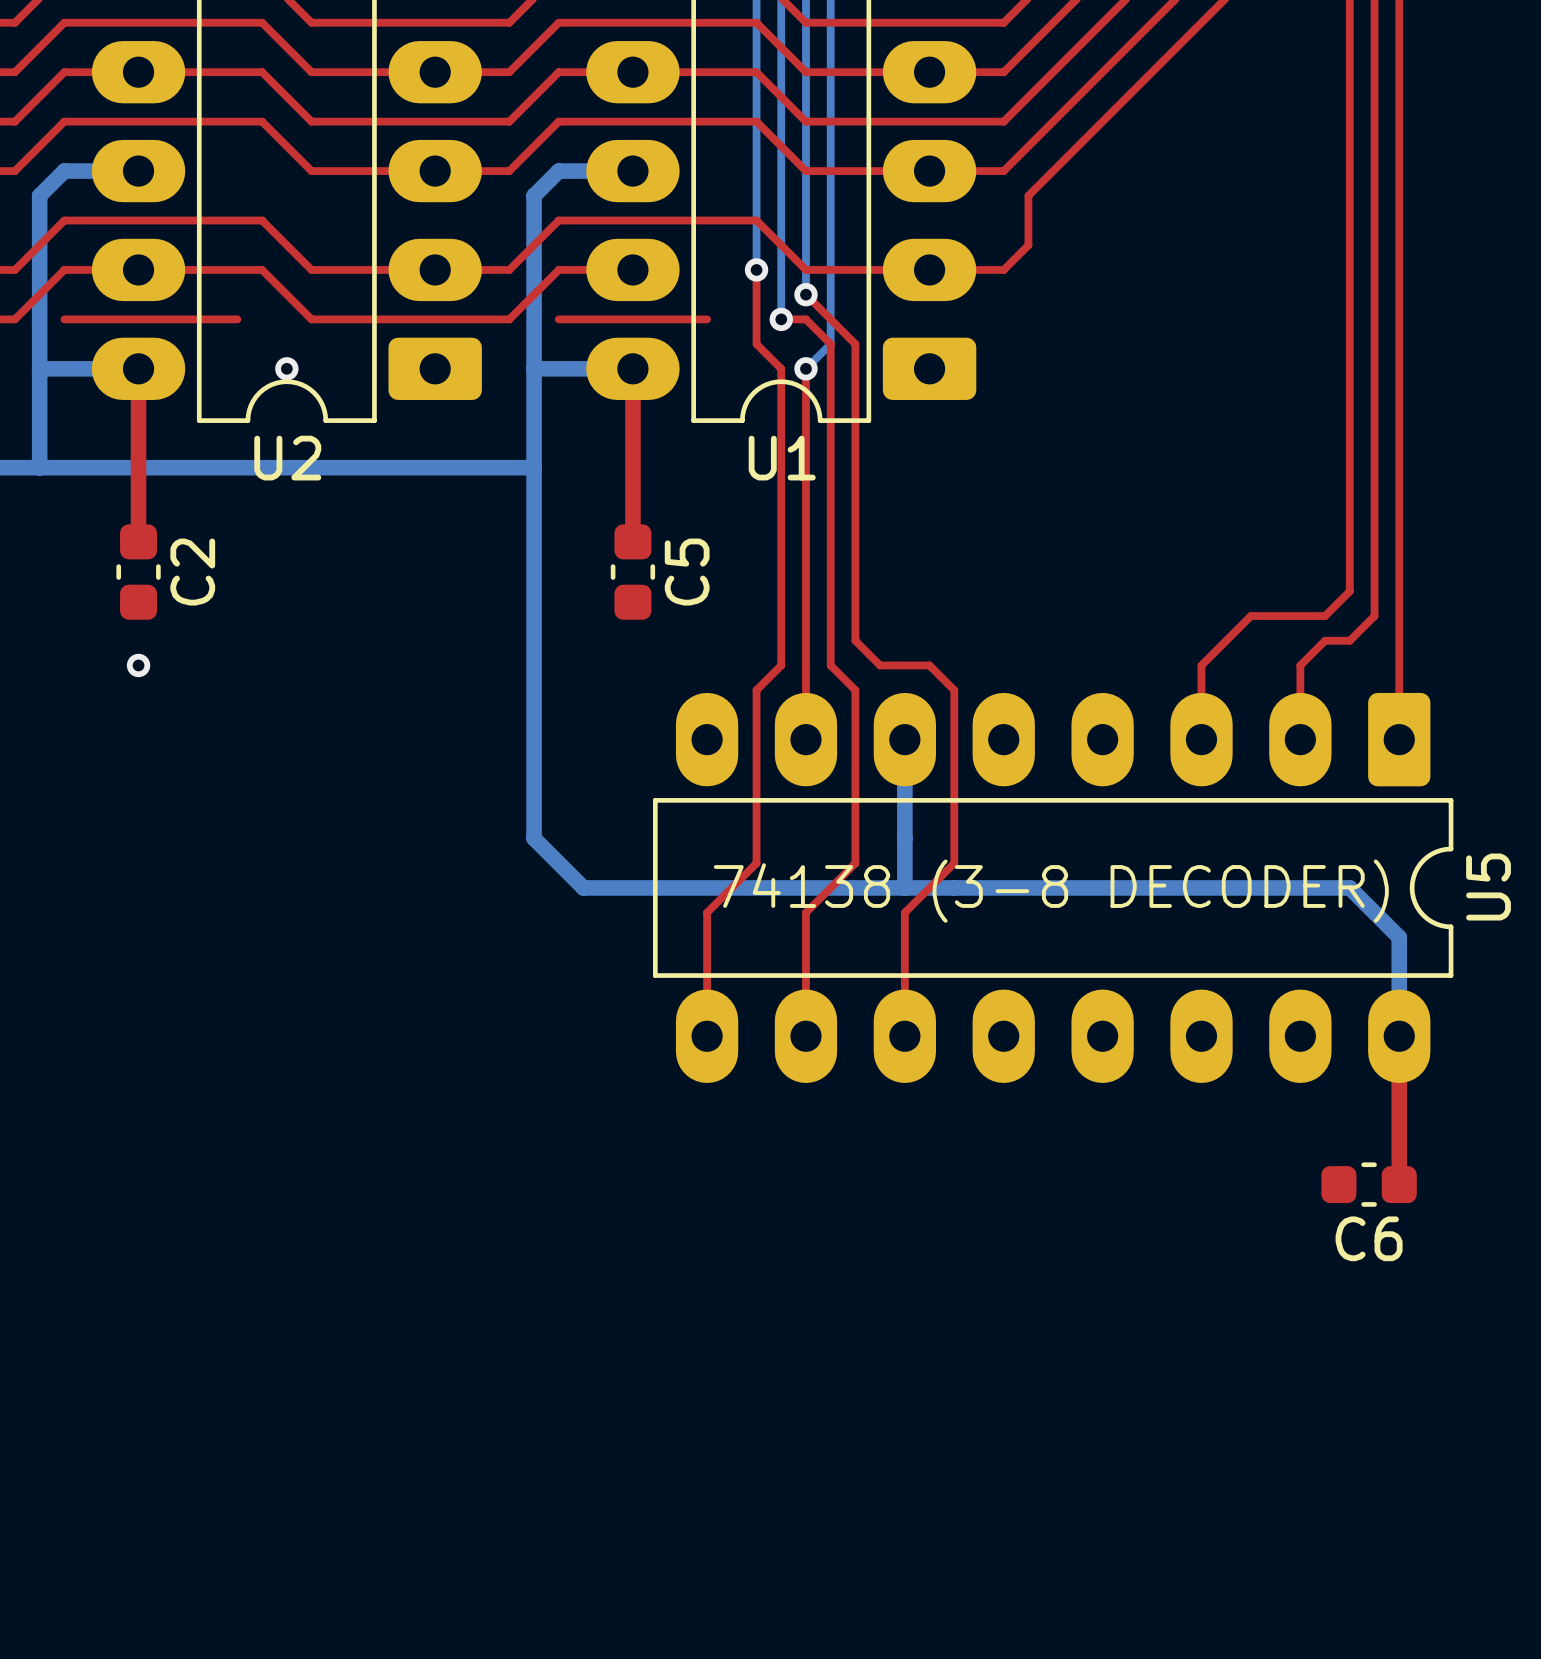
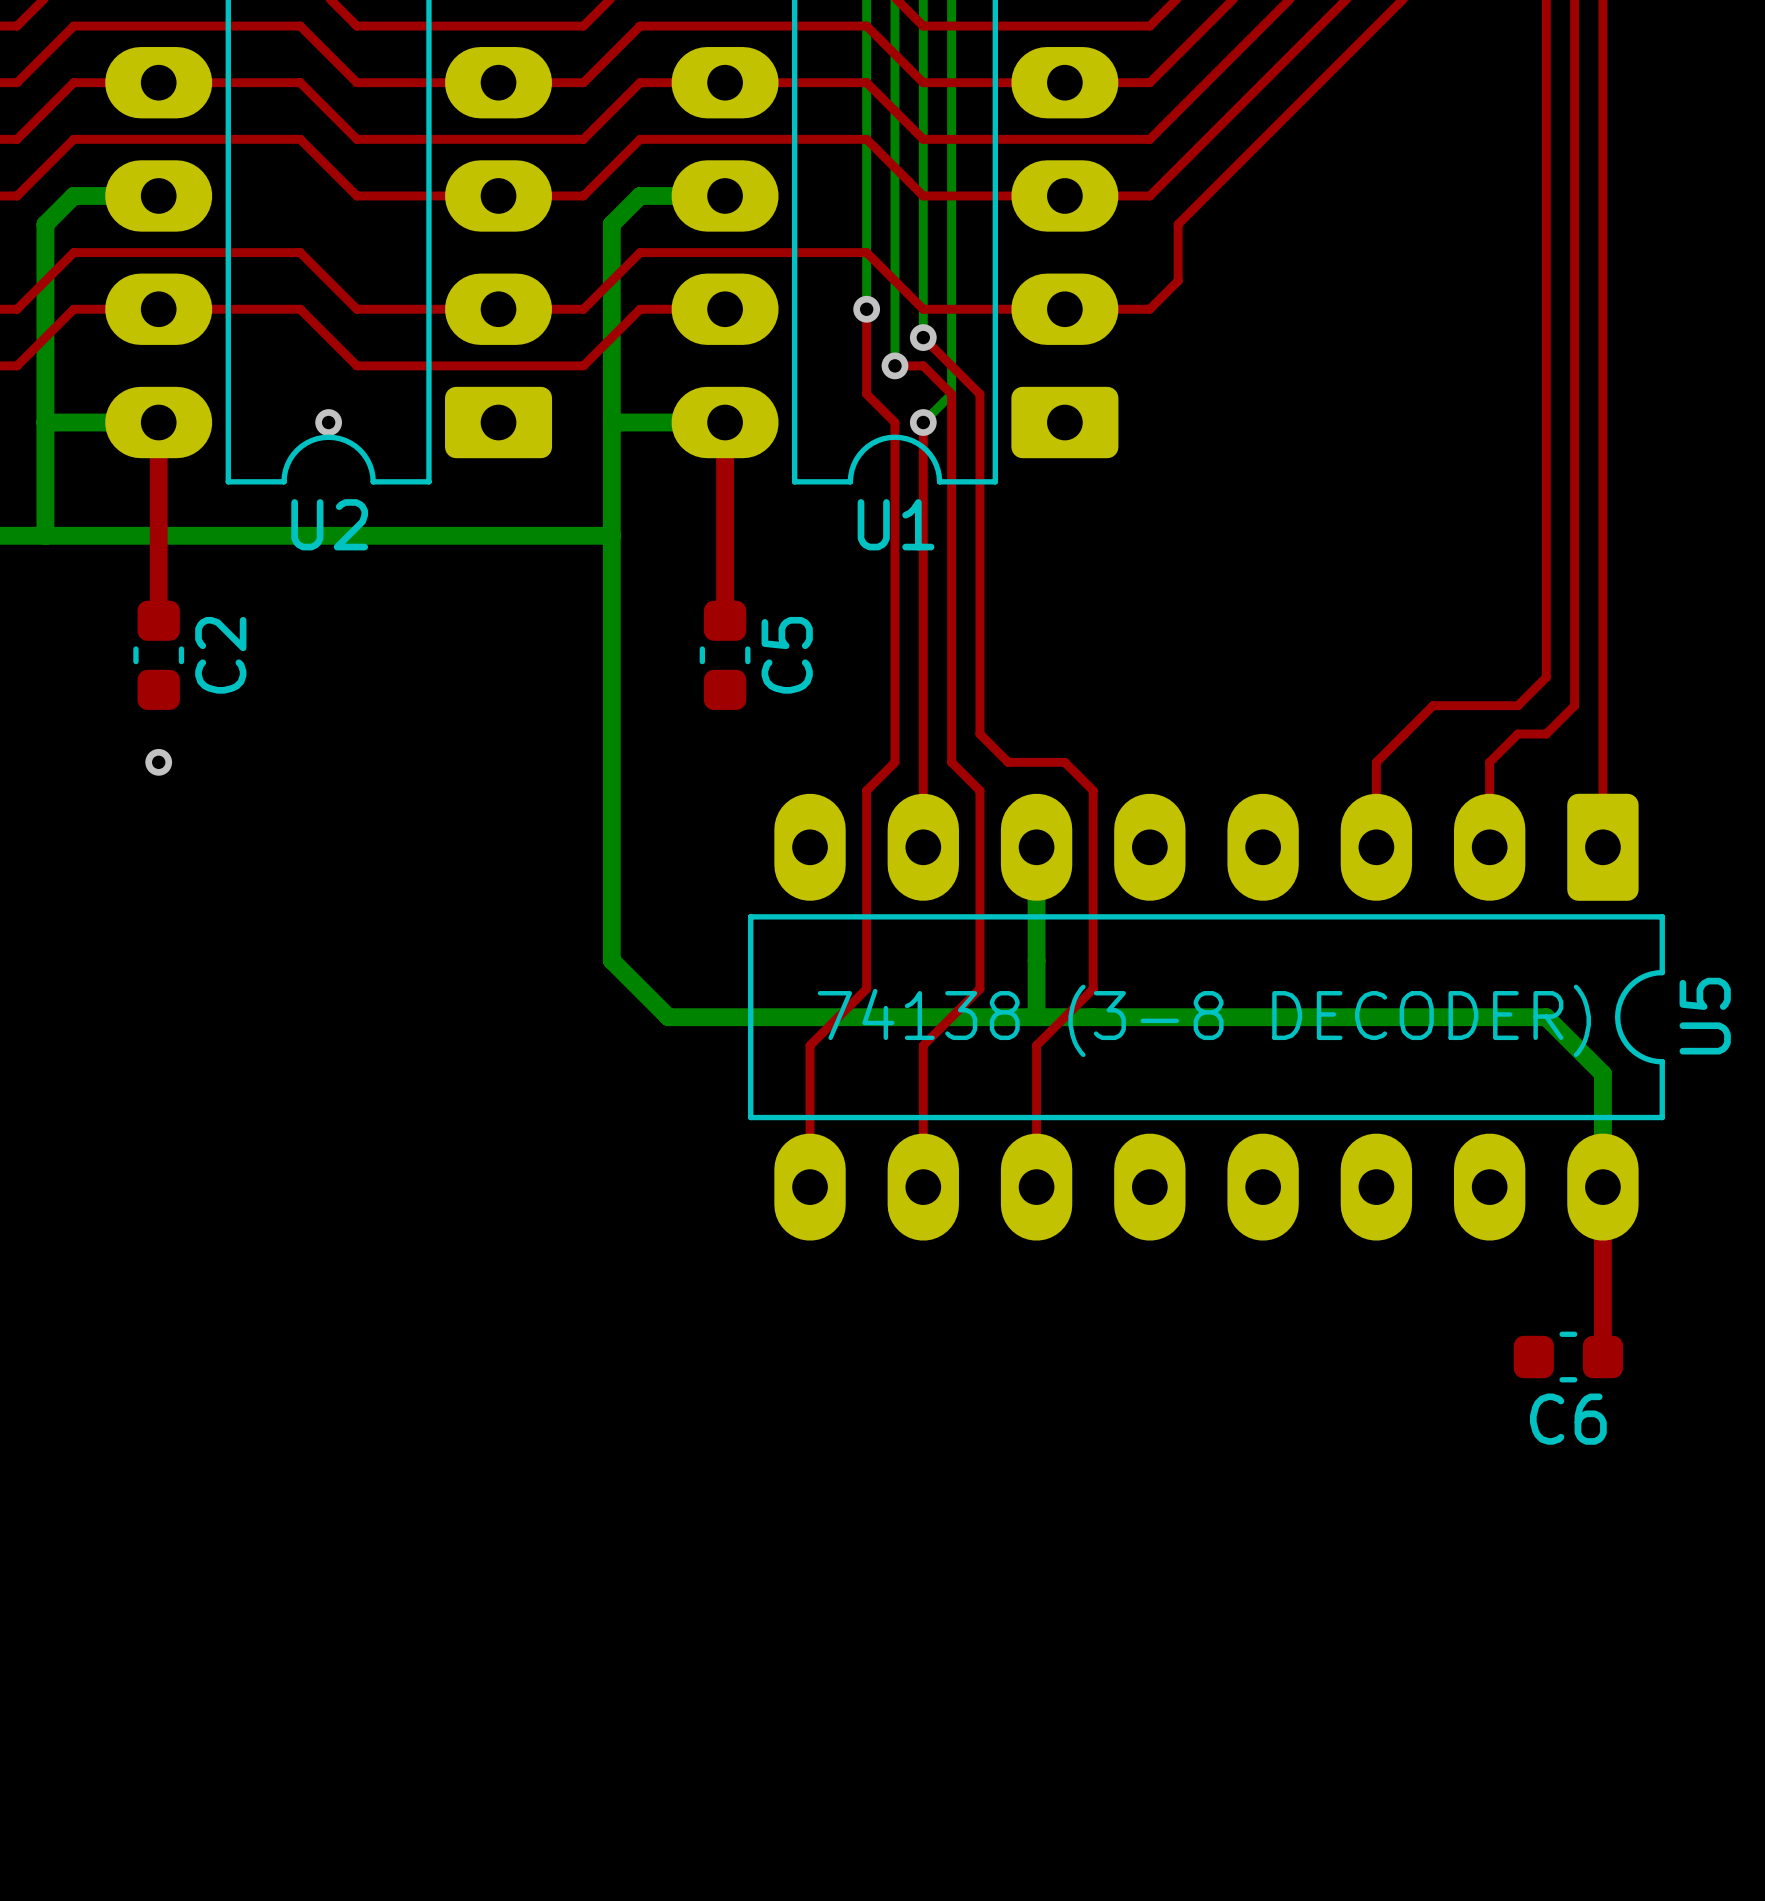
top track: (64, 319) (237, 319) -> none
top track: (558, 319) (707, 319) -> none

